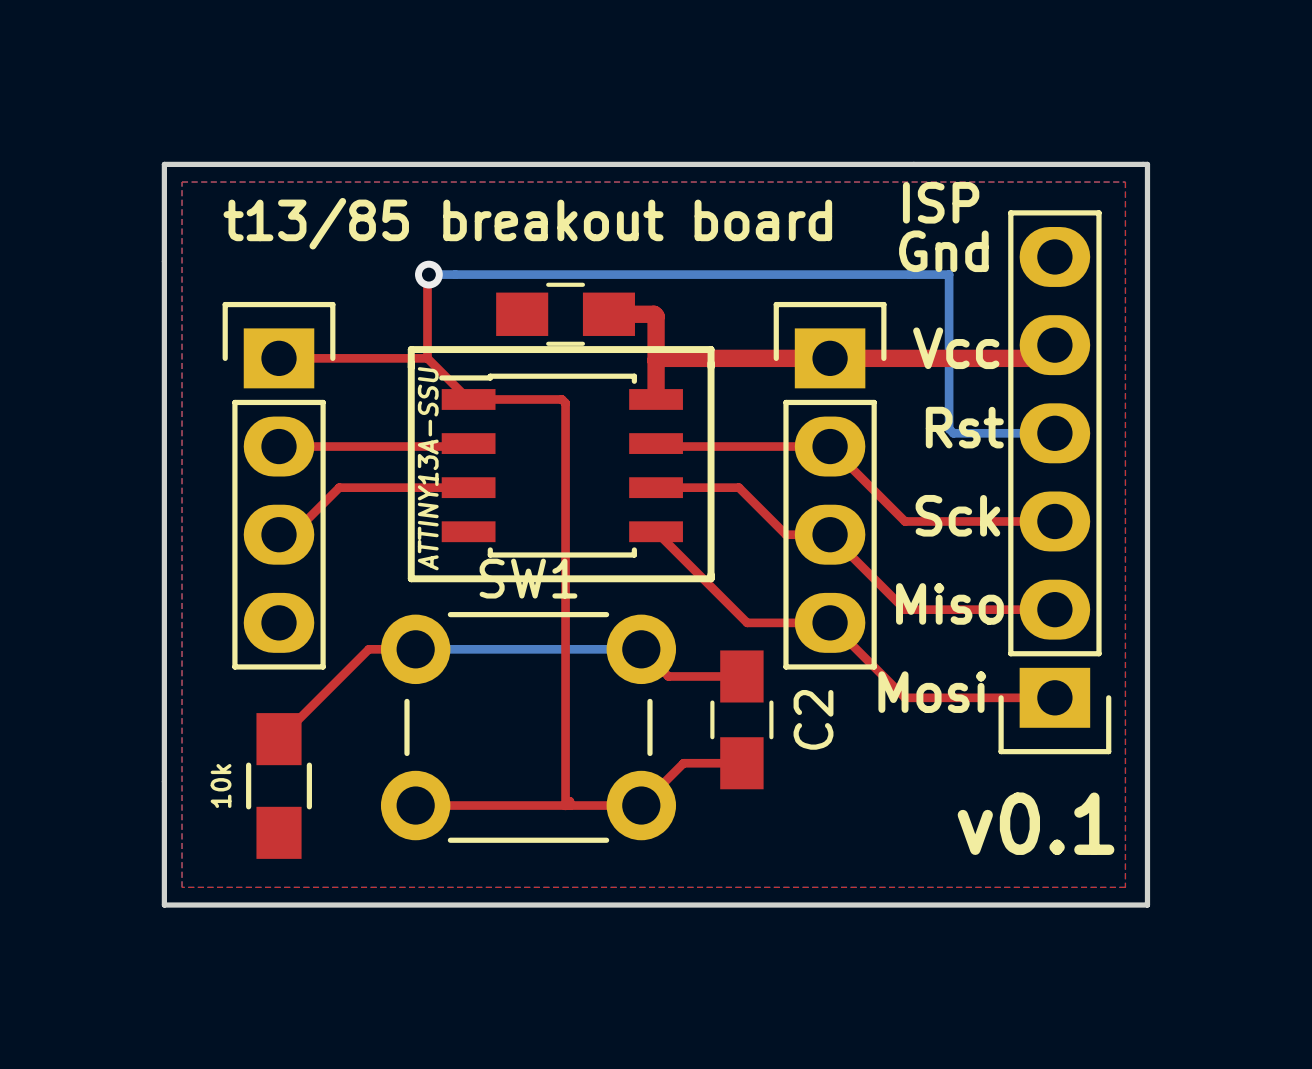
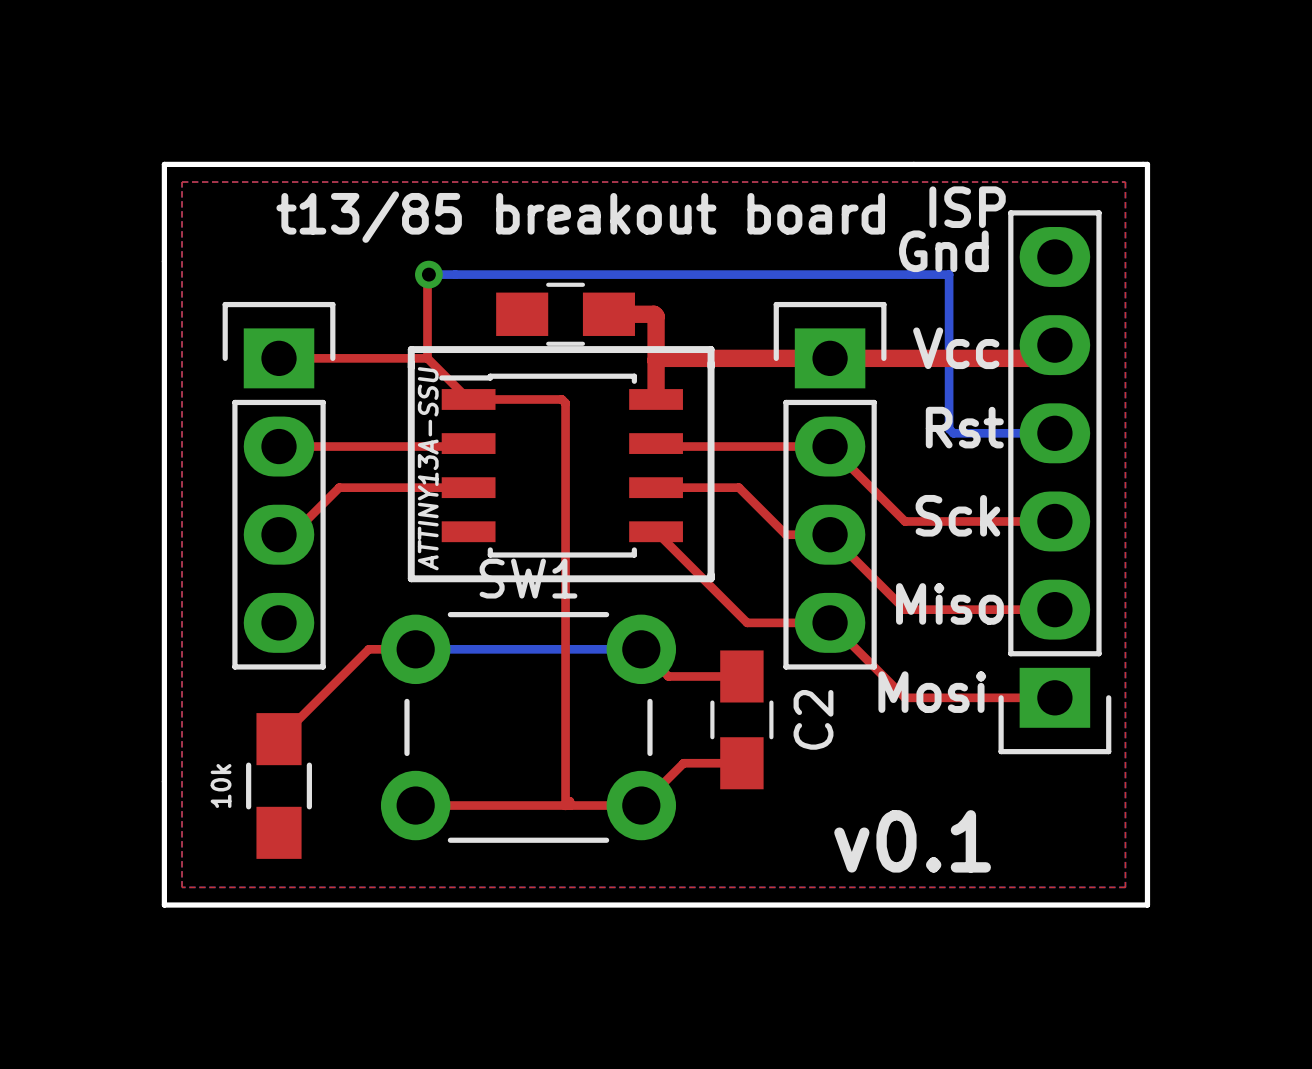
text position: ISP (941, 202) -> ISP (967, 207)
text position: t13/85 breakout board (527, 223) -> t13/85 breakout board (580, 217)
text position: v0.1 (1036, 823) -> v0.1 (912, 841)

